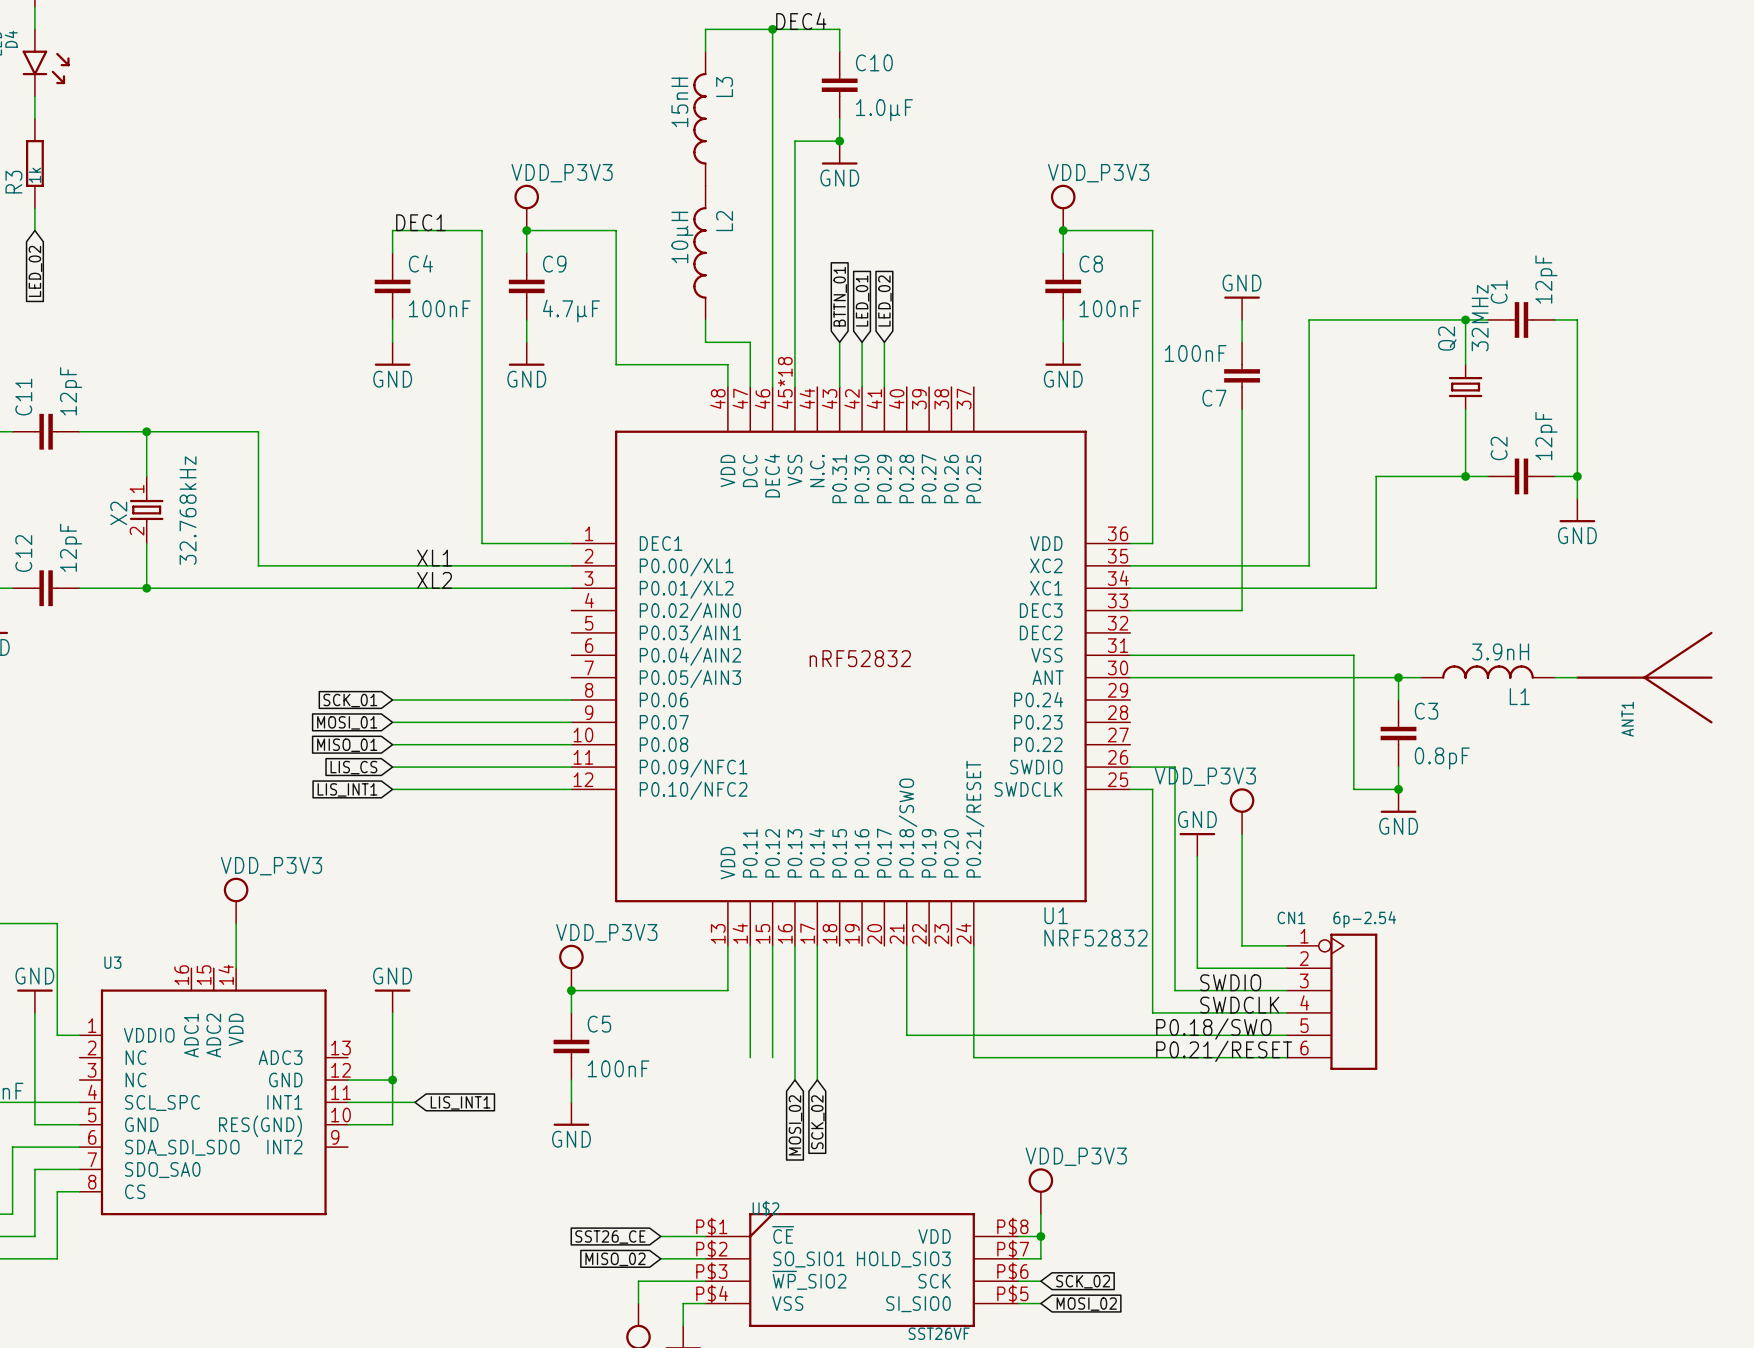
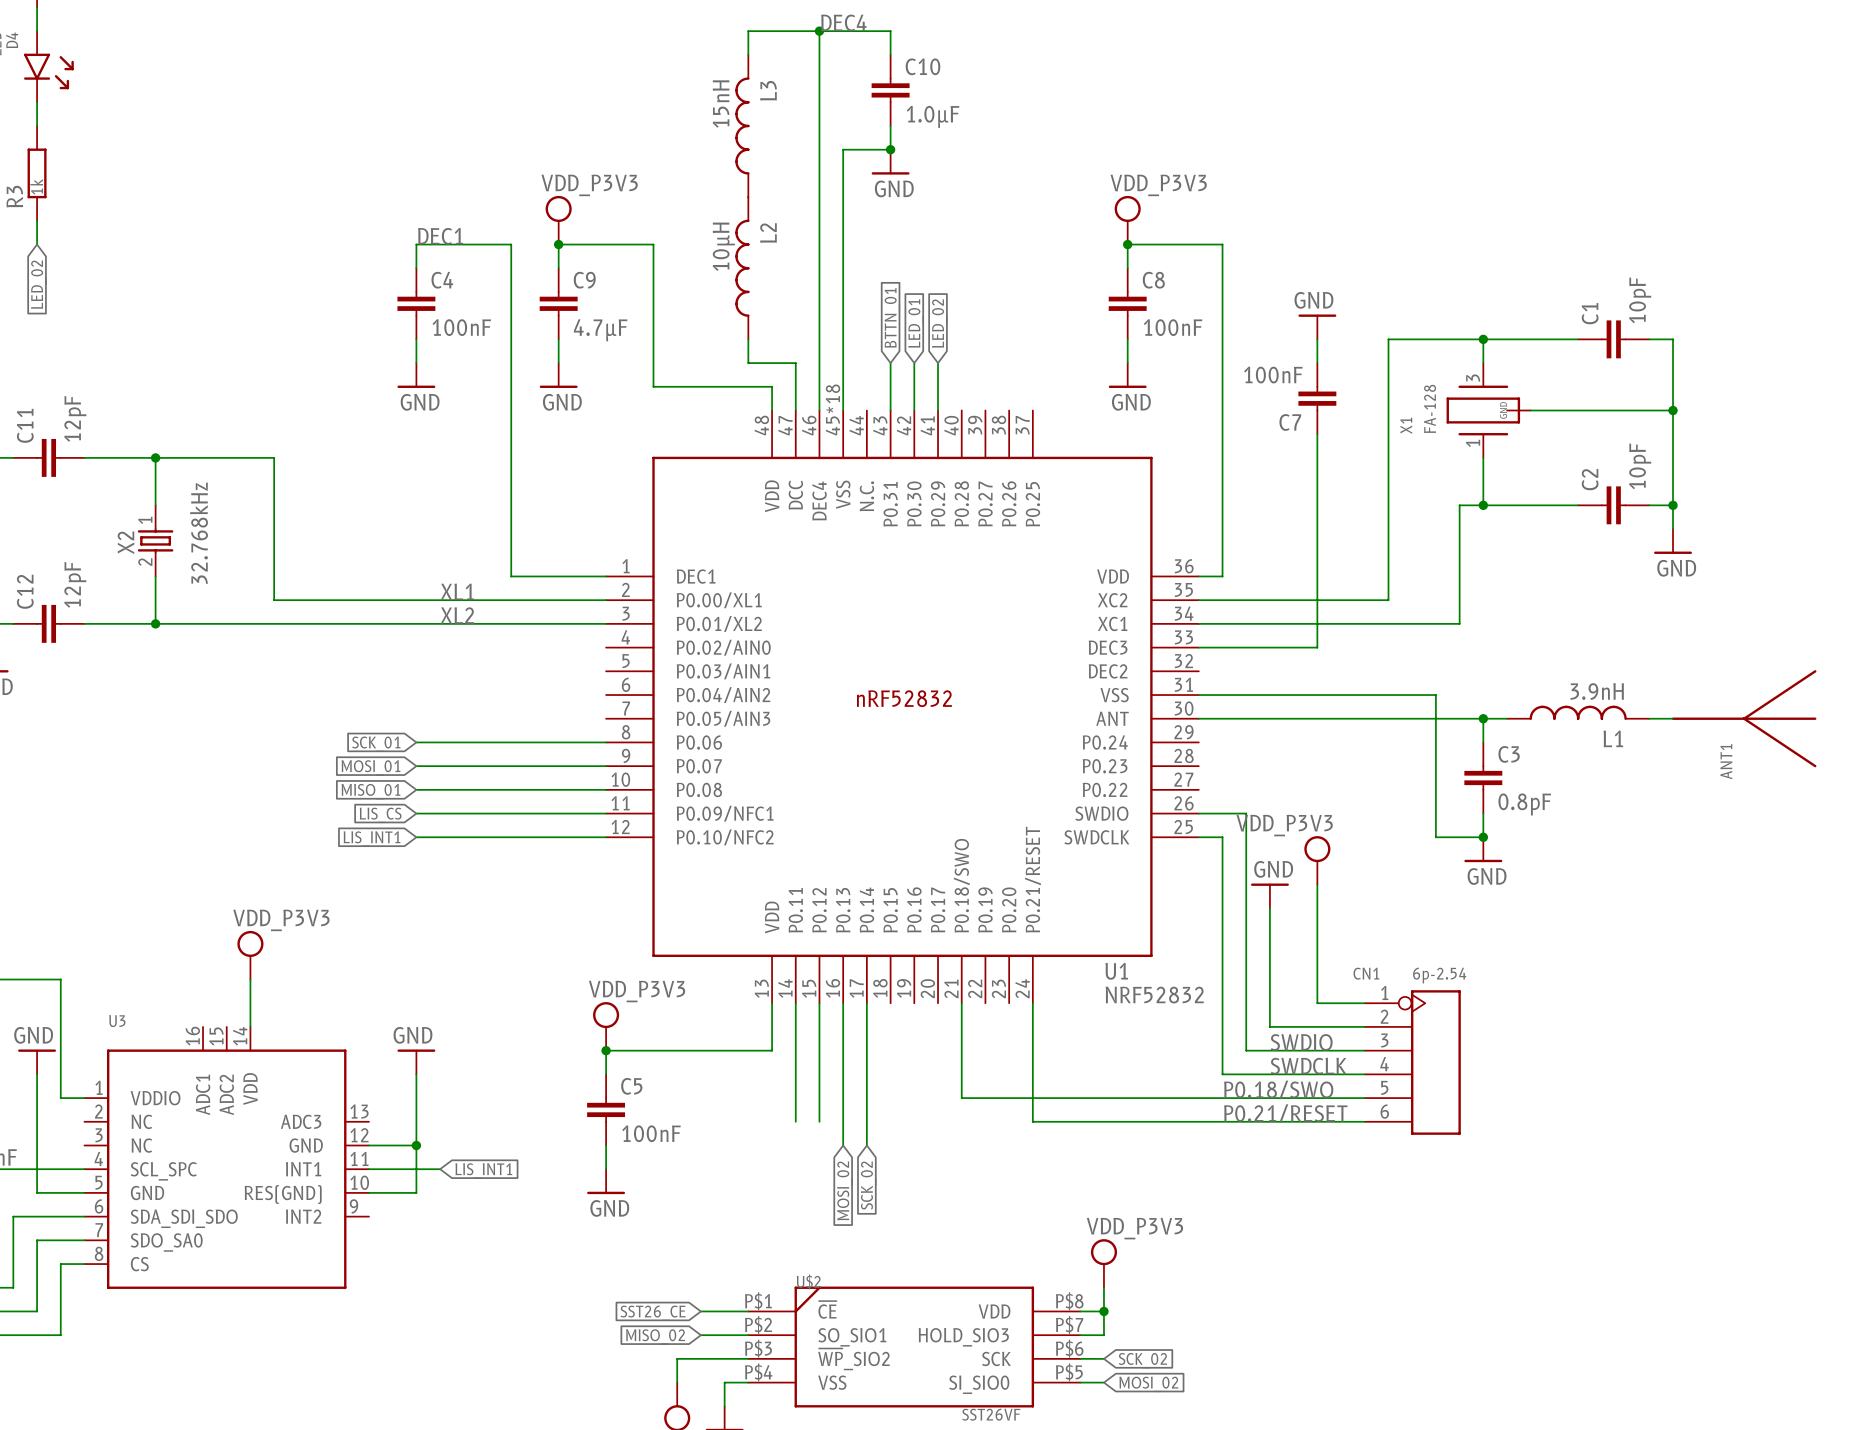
C1 value: 12pF (1546, 279) -> 10pF (1640, 300)
wire: none -> (1483, 339) (1483, 363)
junction: none -> (1483, 339)
wire: (1465, 319) (1465, 364) -> (1483, 457) (1483, 505)
junction: (1465, 319) -> none
X1: none -> FA-128 (1488, 410)
wire: none -> (1530, 410) (1673, 410)
Q2: 32MHz (1465, 387) -> none
junction: none -> (1673, 410)
wire: (1465, 409) (1465, 476) -> none
C2 value: 12pF (1546, 436) -> 10pF (1640, 466)
junction: none -> (1483, 505)
junction: (1465, 476) -> none

